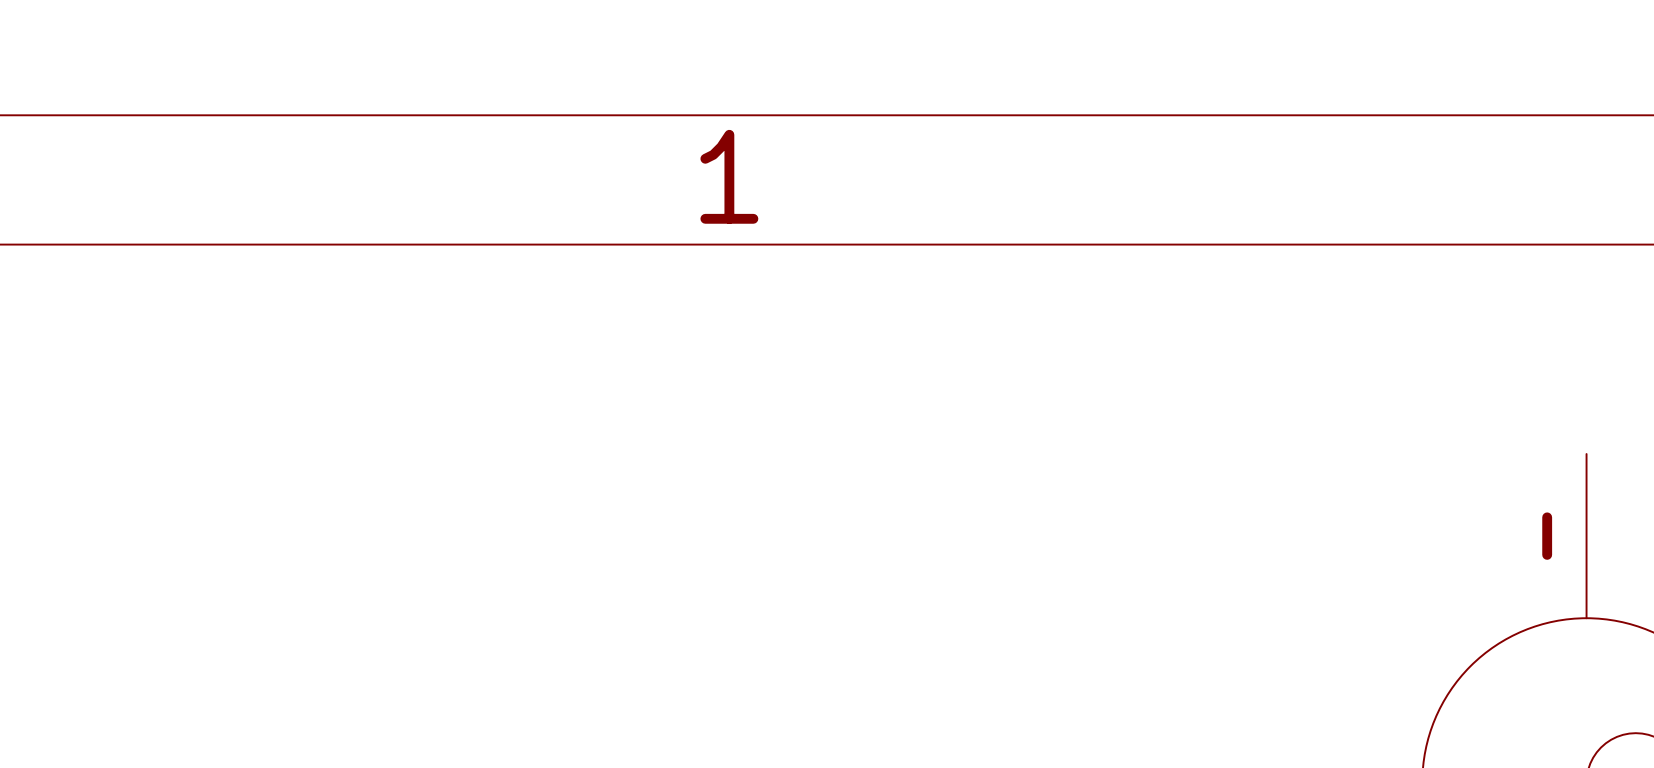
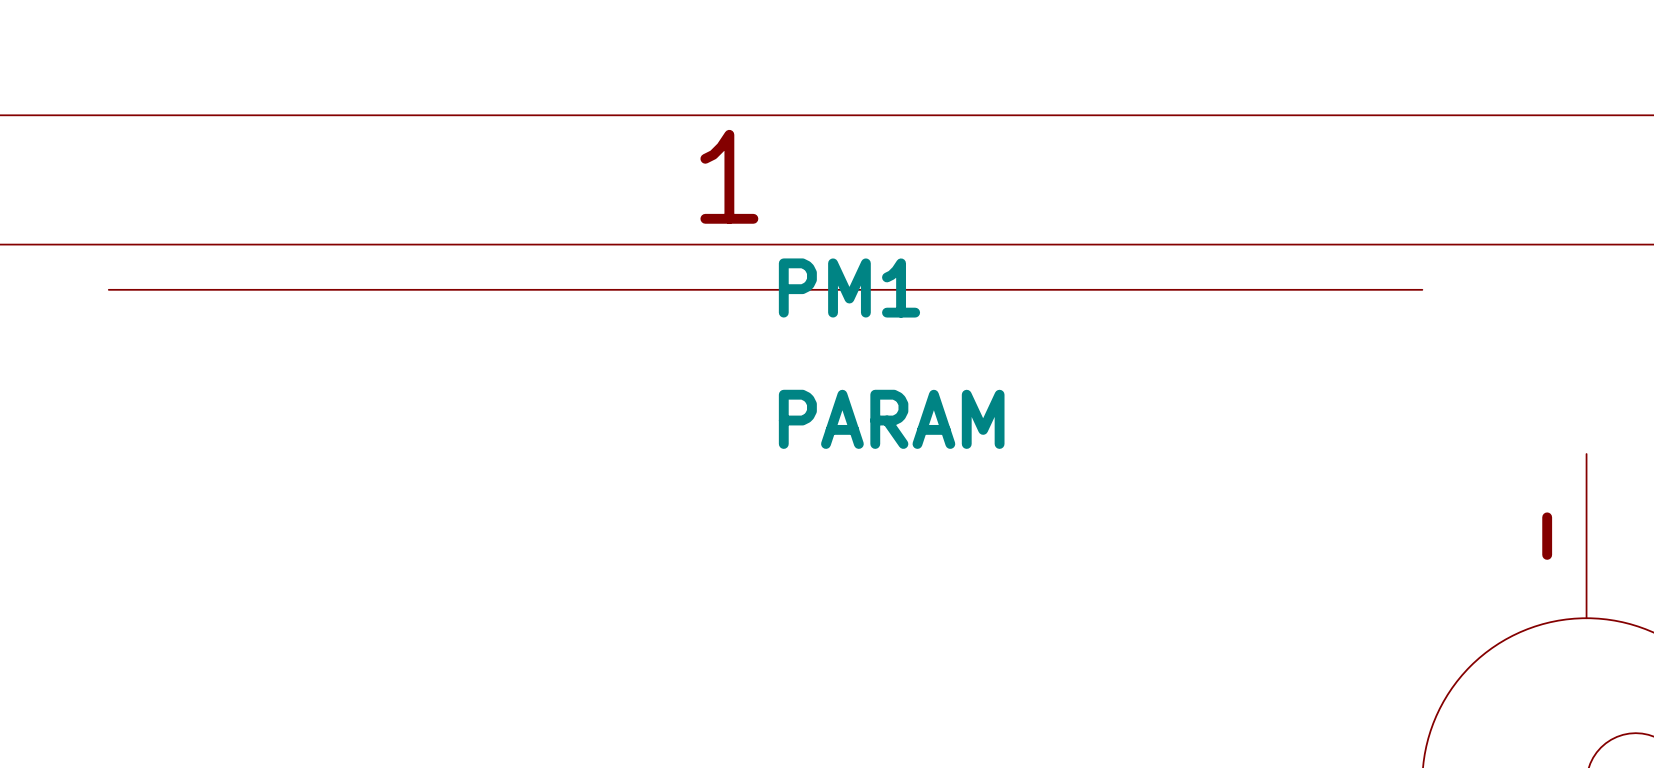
PM1: none -> PARAM (765, 289)

